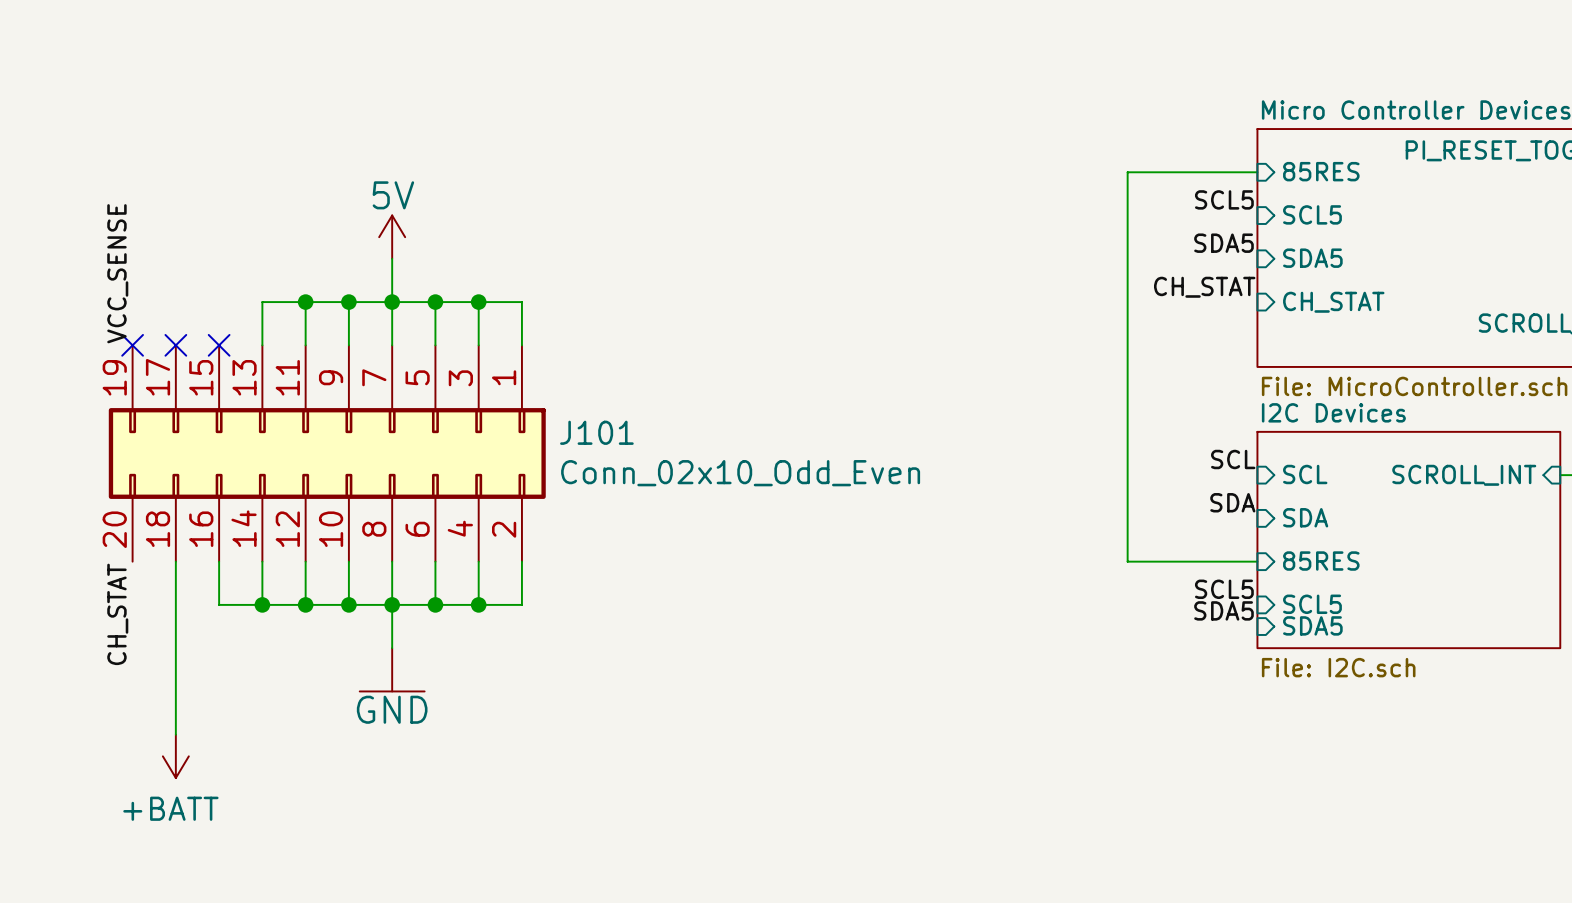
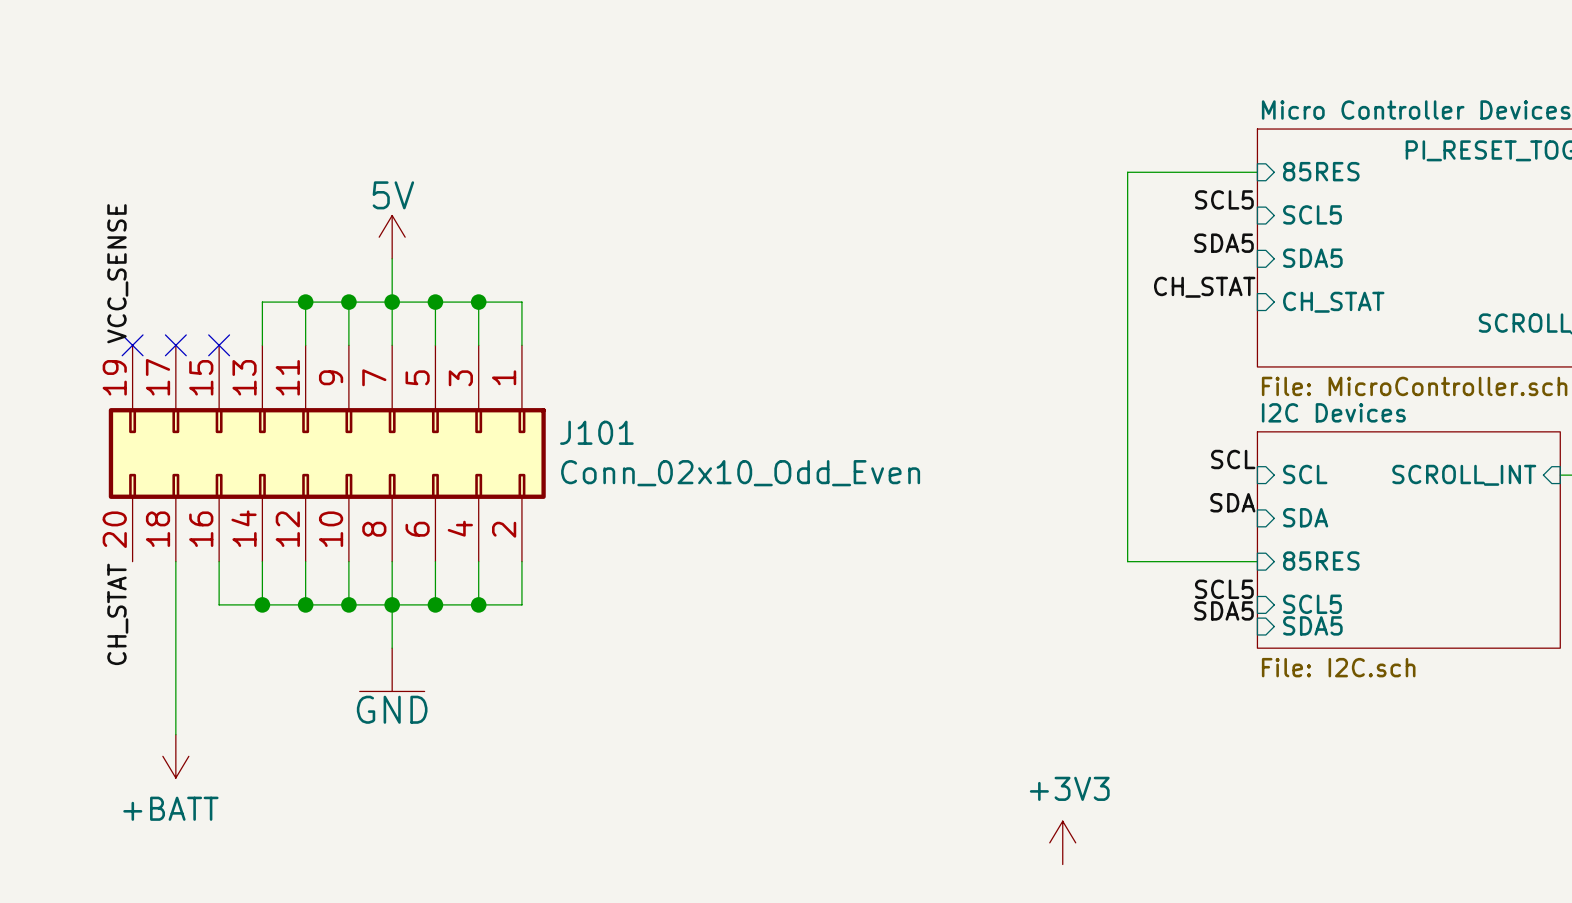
power symbol: none -> +3V3 (1062, 842)

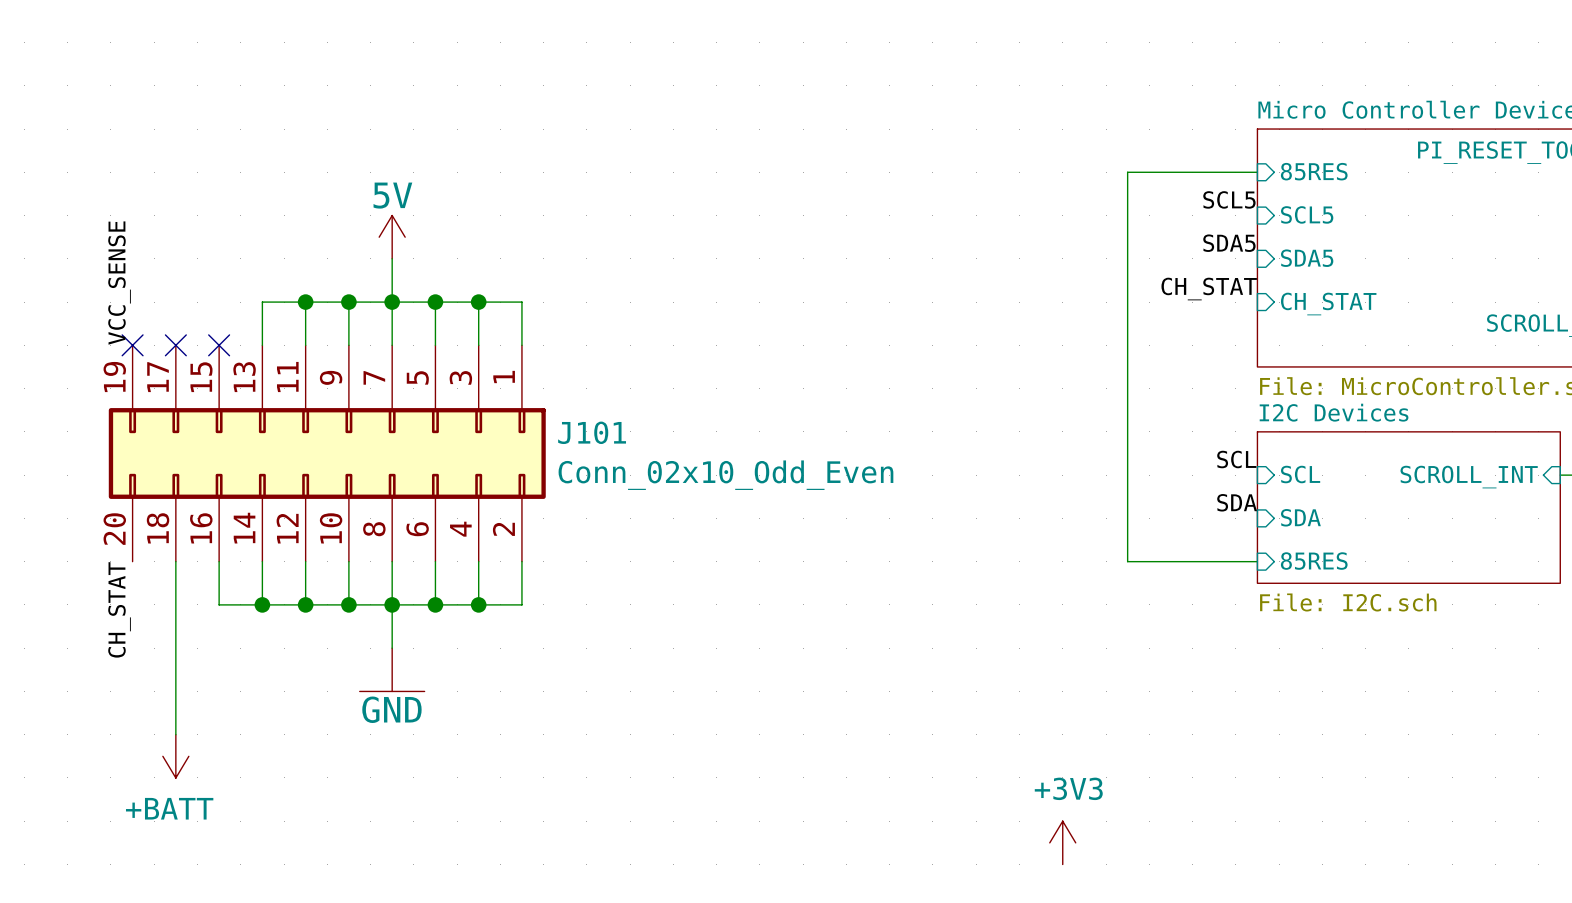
sheet I2C Devices shape: [1257, 431, 1561, 649] -> [1257, 431, 1561, 584]
label: SCL5 (1224, 589) -> none
sheet pin: SCL5 (1312, 604) -> none
label: SDA5 (1223, 610) -> none
sheet pin: SDA5 (1312, 625) -> none

